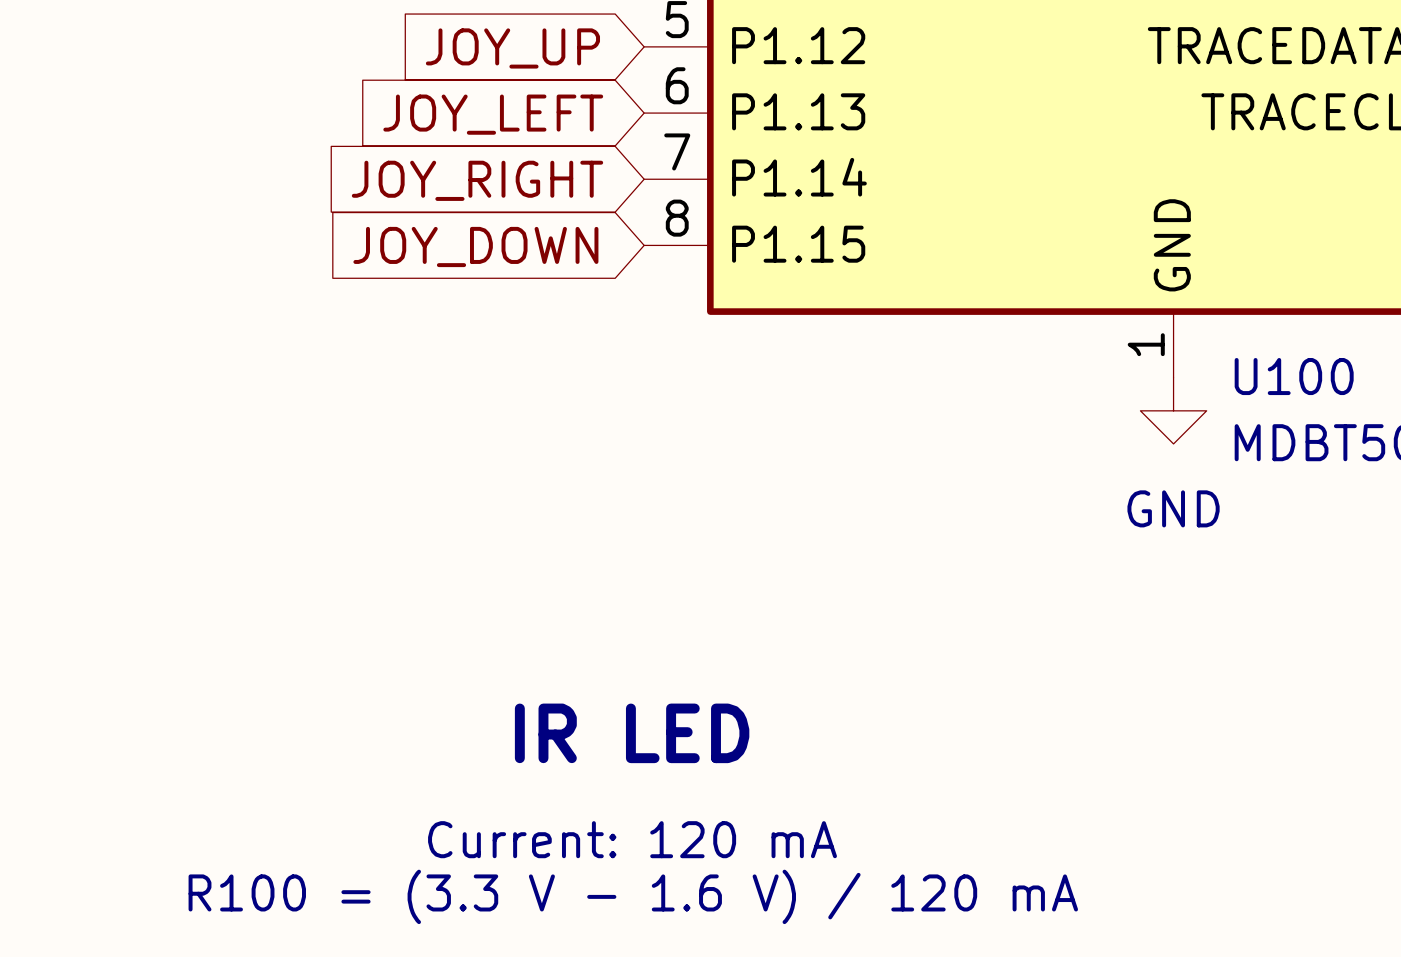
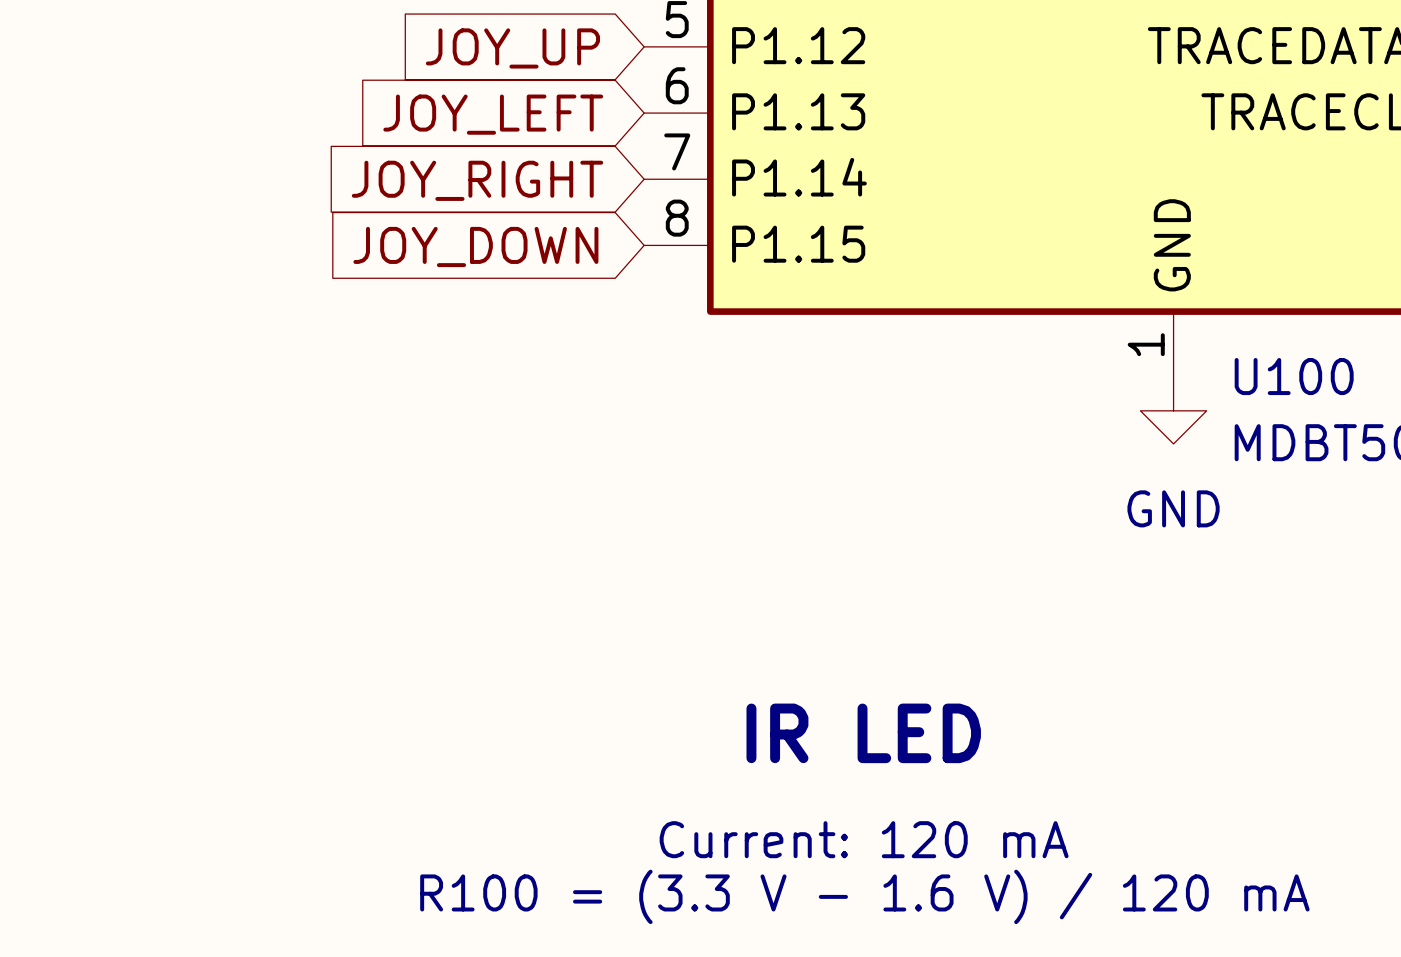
text position: IR LED (632, 733) -> IR LED (863, 733)
text position: Current: 120 mA (632, 839) -> Current: 120 mA (864, 839)
text position: R100 = (3.3 V - 1.6 V) / 120 mA (633, 896) -> R100 = (3.3 V - 1.6 V) / 120 mA (864, 896)

